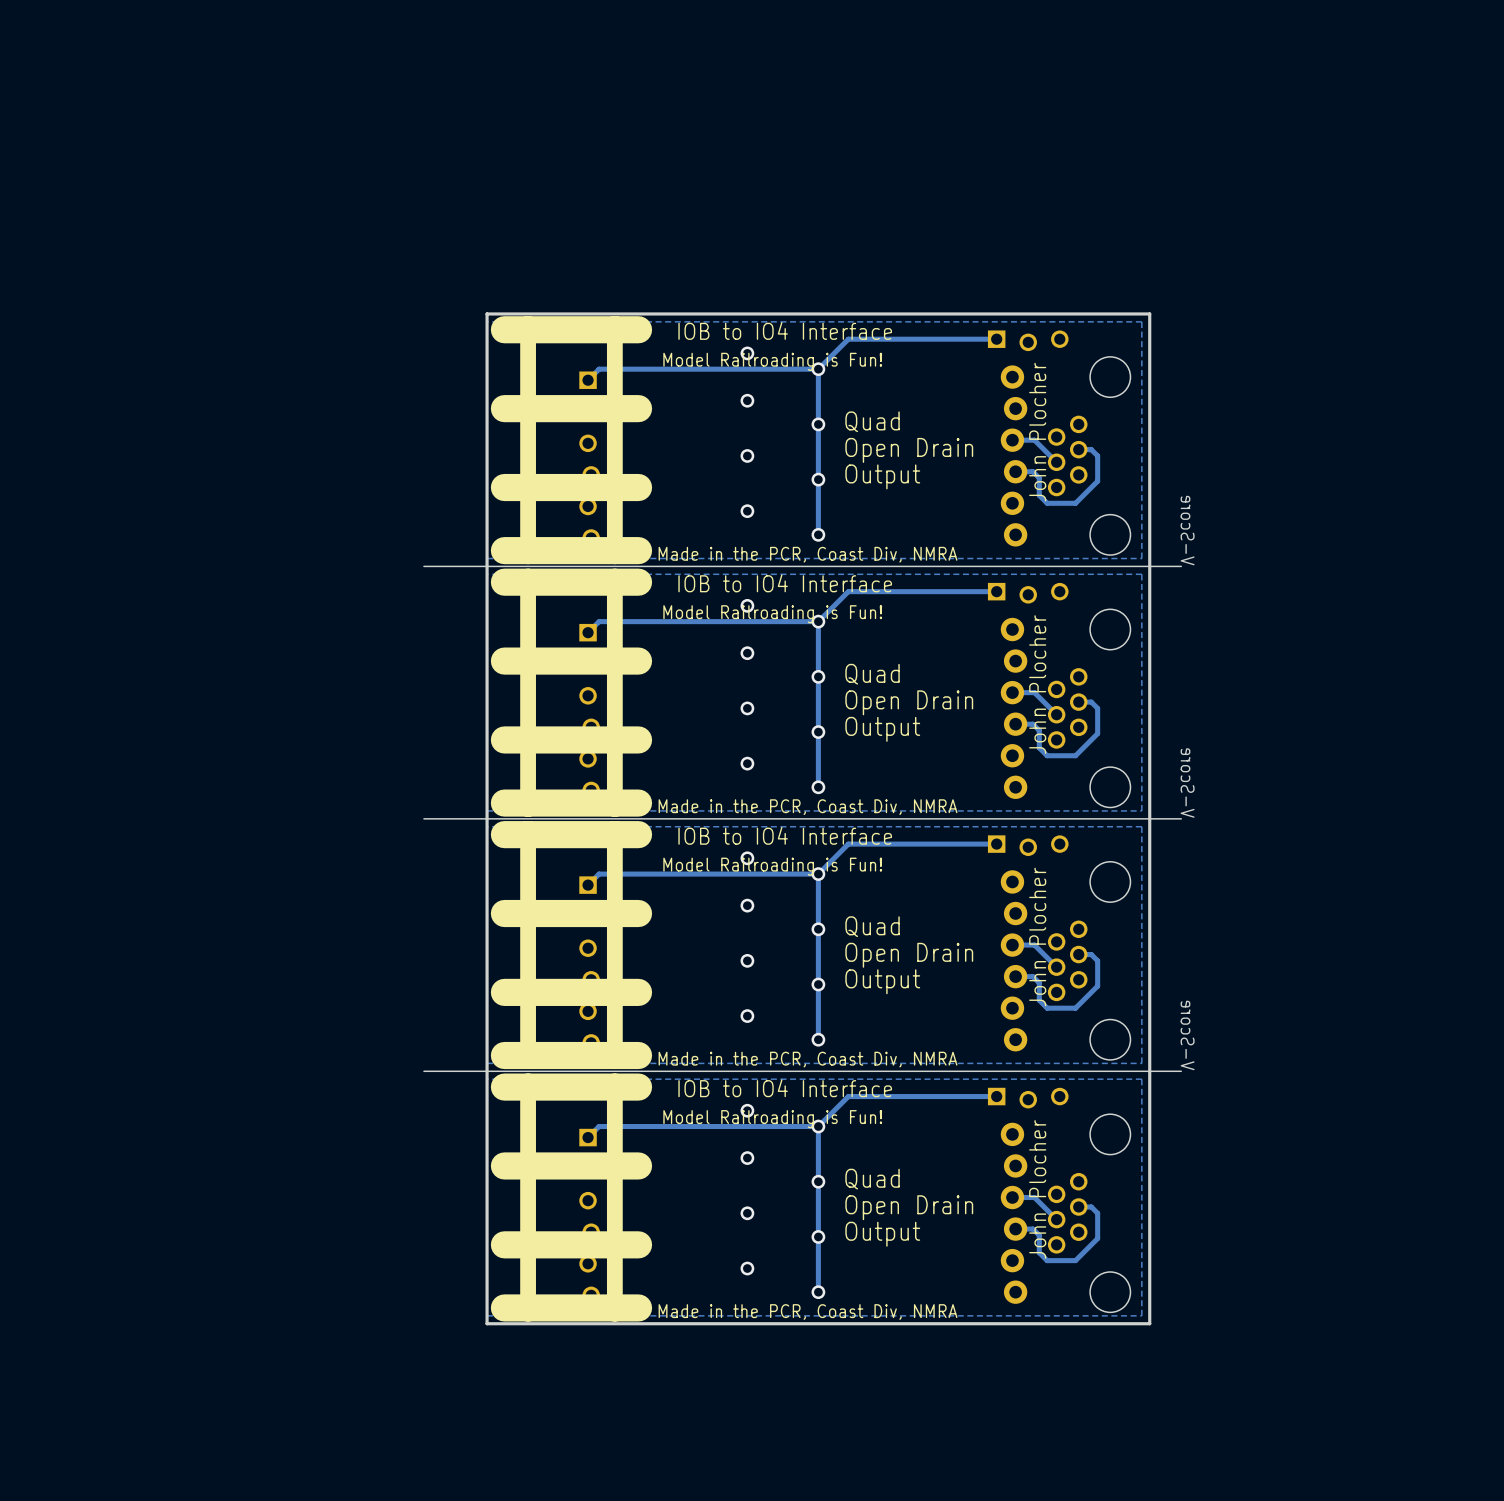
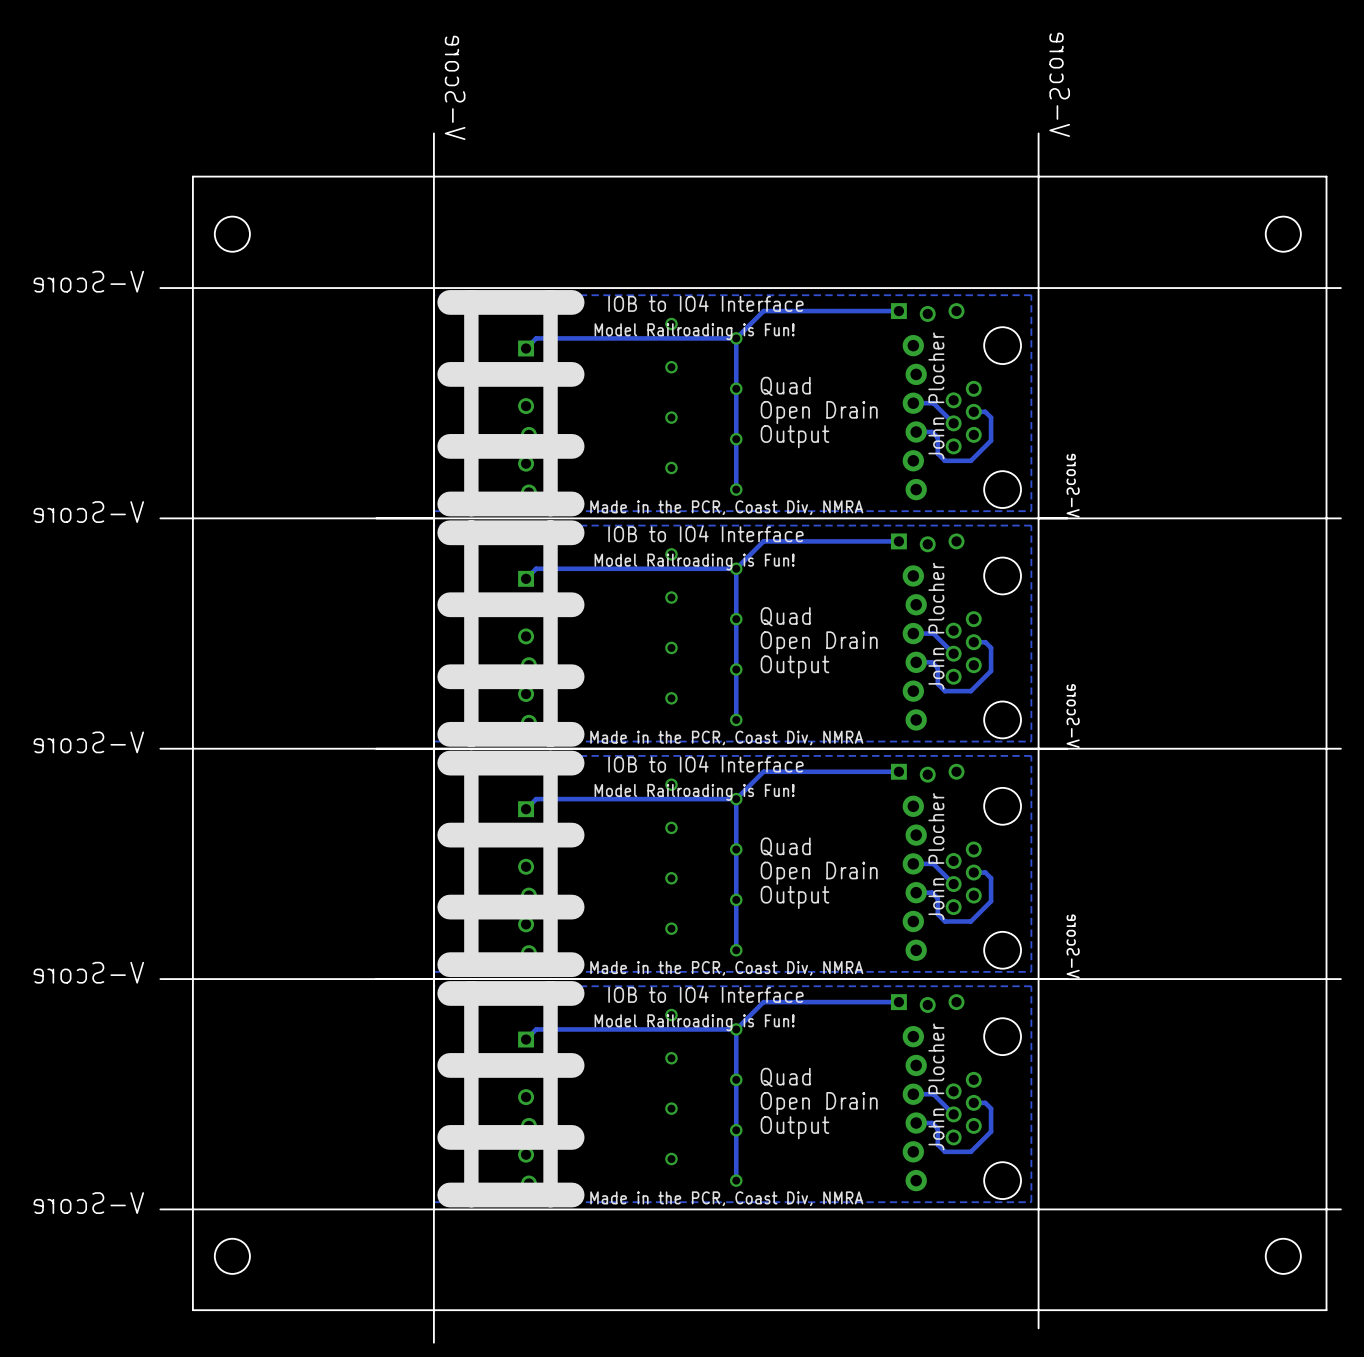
board edge: (1149, 313) (487, 313) -> none
board edge: (1149, 313) (1149, 1323) -> none
board edge: (1149, 566) (487, 566) -> none
part: none -> (750, 738)
board edge: (1149, 1323) (487, 1323) -> none

